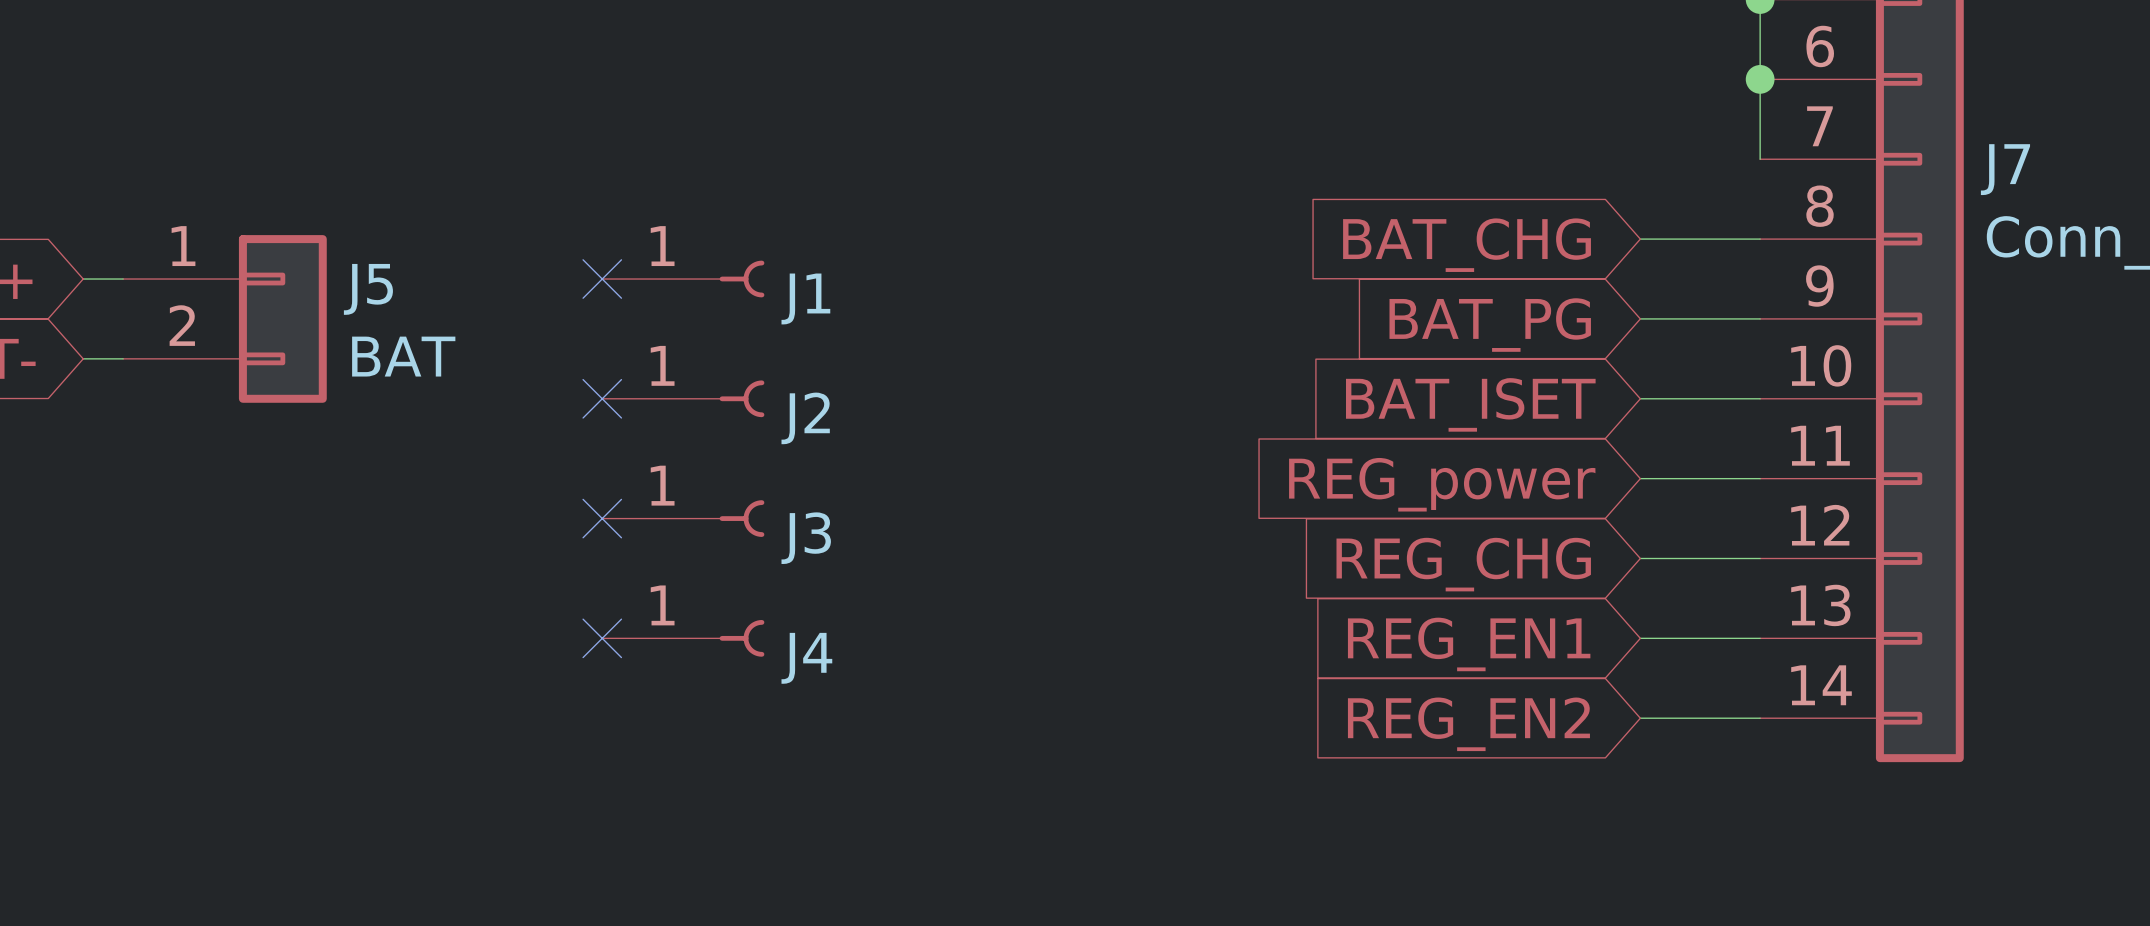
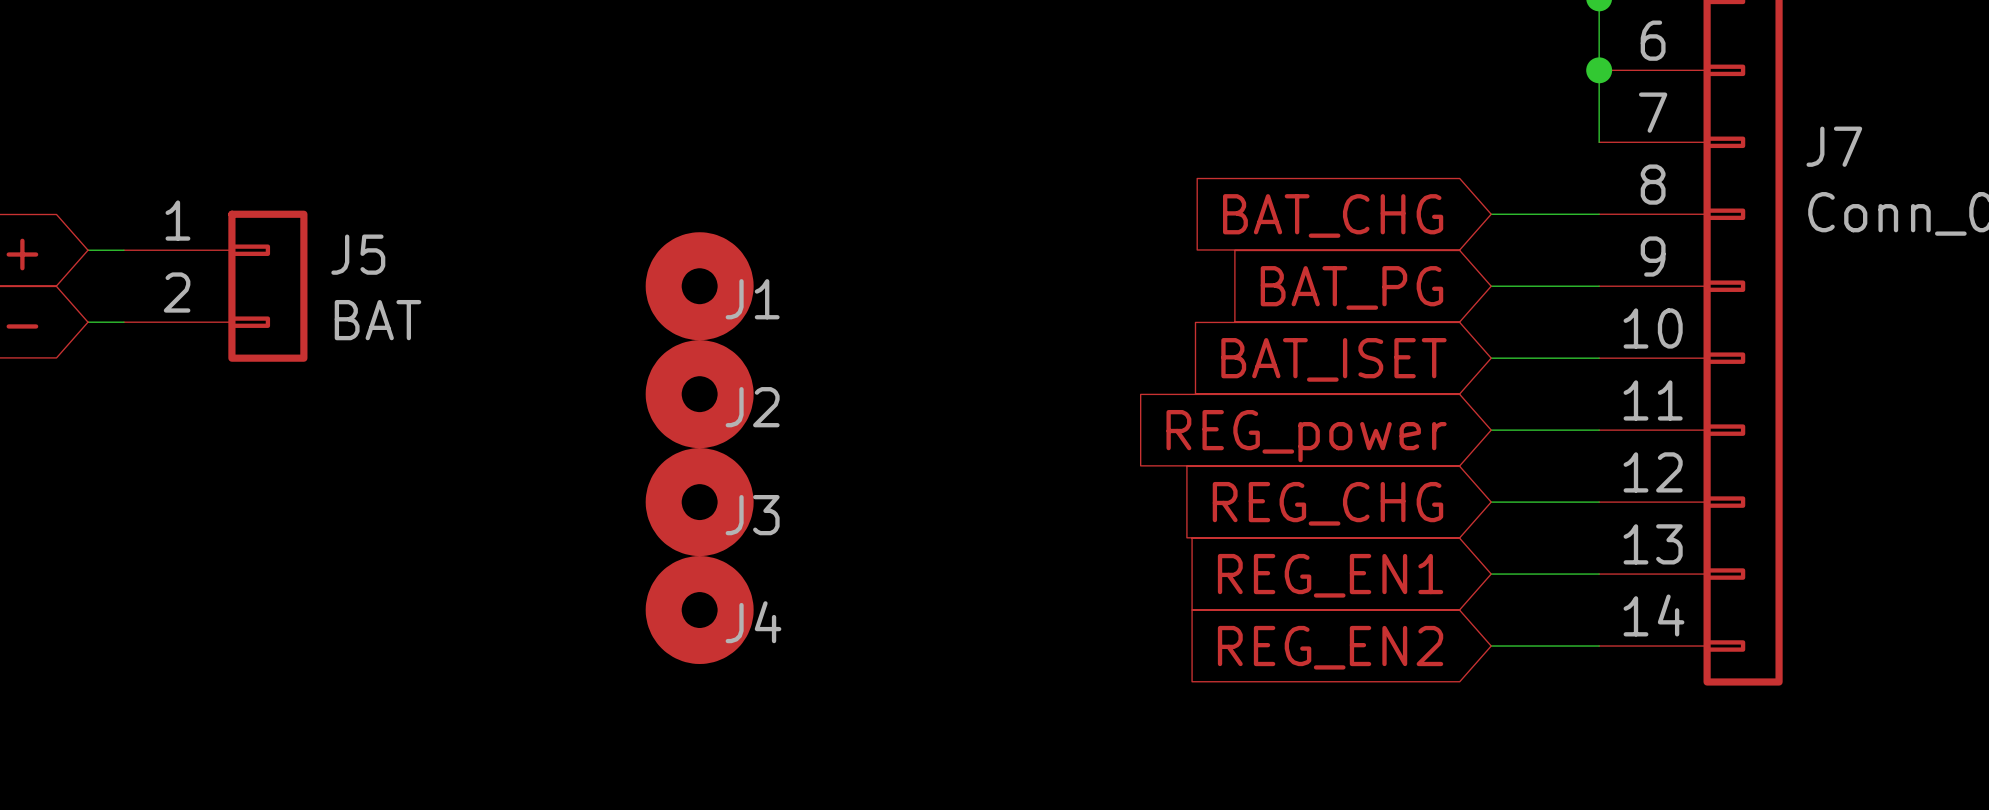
J1 symbol: [602, 260, 765, 298] -> [645, 232, 754, 341]
no-connect mark: (602, 279) -> none
J1 name position: J1 (805, 298) -> J1 (752, 299)
J2 symbol: [602, 380, 765, 418] -> [645, 340, 754, 449]
no-connect mark: (602, 398) -> none
J2 name position: J2 (805, 418) -> J2 (752, 407)
J3 symbol: [602, 500, 765, 537] -> [645, 448, 754, 557]
no-connect mark: (602, 518) -> none
J3 name position: J3 (806, 538) -> J3 (752, 515)
J4 symbol: [602, 619, 765, 657] -> [645, 556, 754, 665]
no-connect mark: (602, 638) -> none
J4 name position: J4 (806, 658) -> J4 (753, 622)

